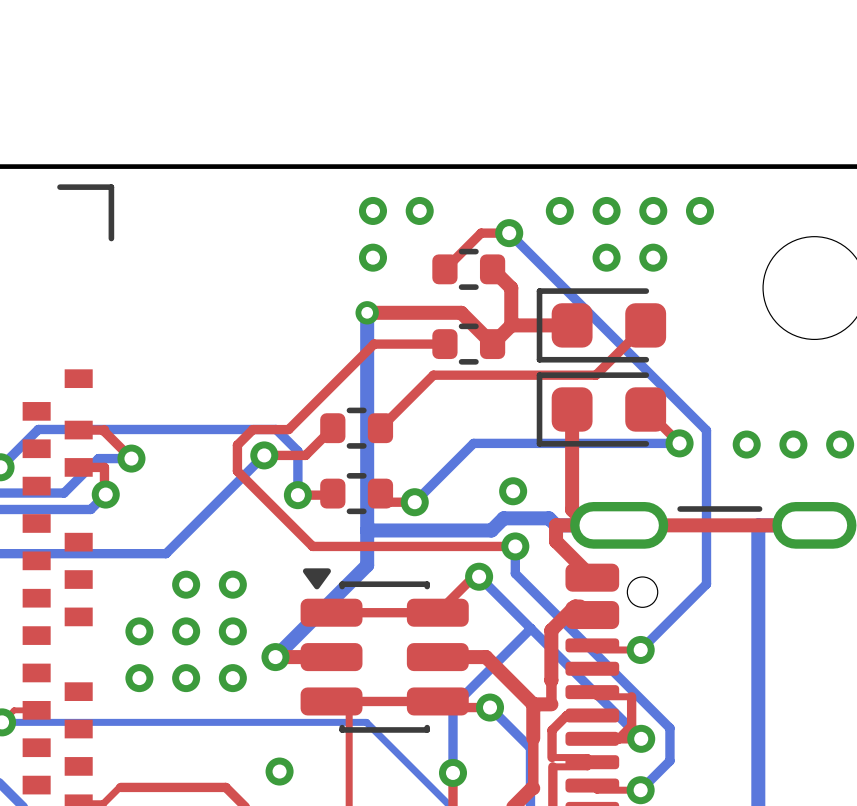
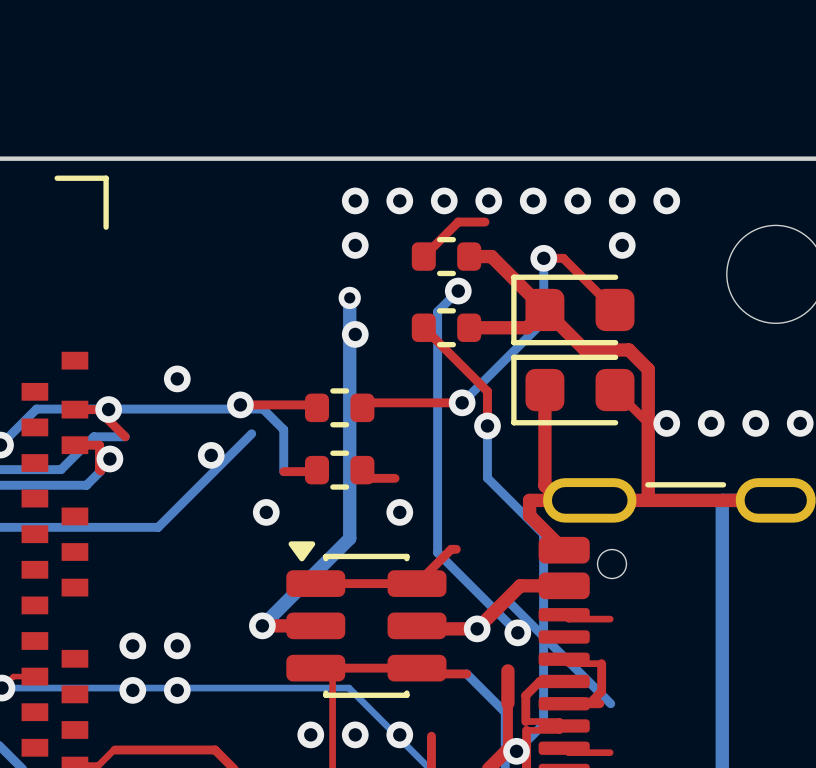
via: none -> (444, 200)
bottom track: (509, 233) (706, 430) (706, 584) (640, 649) -> none
via position: (509, 233) -> (488, 200)
via: (606, 257) -> none
top track: (492, 269) (511, 288) (511, 325) -> (469, 256) (491, 256) (584, 349) (628, 349) (648, 369) (648, 500)
top track: none -> (543, 258) (563, 258) (615, 309)
bottom track: none -> (543, 258) (543, 321) (462, 402)
via: none -> (543, 258)
bottom track: none -> (458, 291) (437, 311) (437, 552) (517, 632)
via: none -> (458, 291)
top track: (367, 312) (461, 312) (492, 344) (511, 325) -> none
top track: (511, 325) (572, 325) -> (469, 327) (527, 327) (544, 309)
top track: (645, 325) (595, 375) (433, 375) (385, 422) -> (462, 402) (367, 402)
top track: (444, 344) (374, 344) (288, 429) (252, 429) (237, 445) (237, 471) (312, 546) (515, 546) -> (423, 327) (487, 391) (487, 425)
via: none -> (355, 334)
via: none -> (177, 378)
via: none -> (462, 402)
via: none -> (240, 404)
top track: (332, 428) (305, 455) (264, 455) -> (317, 407) (314, 404) (240, 404)
via: none -> (108, 409)
bottom track: (679, 443) (473, 443) (414, 502) -> none
via position: (679, 443) -> (666, 423)
bottom track: none -> (487, 425) (487, 478) (543, 534) (543, 724) (516, 751)
via: none -> (487, 425)
via: (264, 455) -> none
via: (131, 458) -> none
via: none -> (211, 455)
via: none -> (109, 459)
via: (513, 491) -> none
via: (105, 494) -> none
via: (297, 495) -> none
via: (414, 502) -> none
bottom track: (619, 525) (556, 525) (549, 518) (503, 518) (491, 530) (367, 530) -> none
via: none -> (266, 512)
via: none -> (399, 512)
bottom track: (515, 546) (515, 573) (669, 728) (669, 760) (640, 790) -> none
via: (515, 546) -> none
bottom track: (479, 576) (530, 628) (452, 706) (452, 772) -> none
via: (479, 576) -> none
via: (186, 584) -> none
via: (232, 584) -> none
top track: (592, 615) (583, 606) (575, 606) (551, 630) (551, 704) (533, 704) (485, 657) (437, 657) -> (564, 585) (520, 585) (477, 628) (420, 628) (417, 625)
via: (139, 631) -> none
via: (186, 631) -> none
via: (232, 631) -> none
via: (640, 649) -> none
via: none -> (477, 628)
via: none -> (517, 632)
via: (232, 678) -> none
via: (490, 707) -> none
via: none -> (132, 690)
via: none -> (177, 690)
via: (641, 738) -> none
via: (279, 771) -> none
via: none -> (310, 734)
via: none -> (355, 734)
via position: (452, 772) -> (399, 734)
via: none -> (516, 751)
via: (640, 790) -> none

